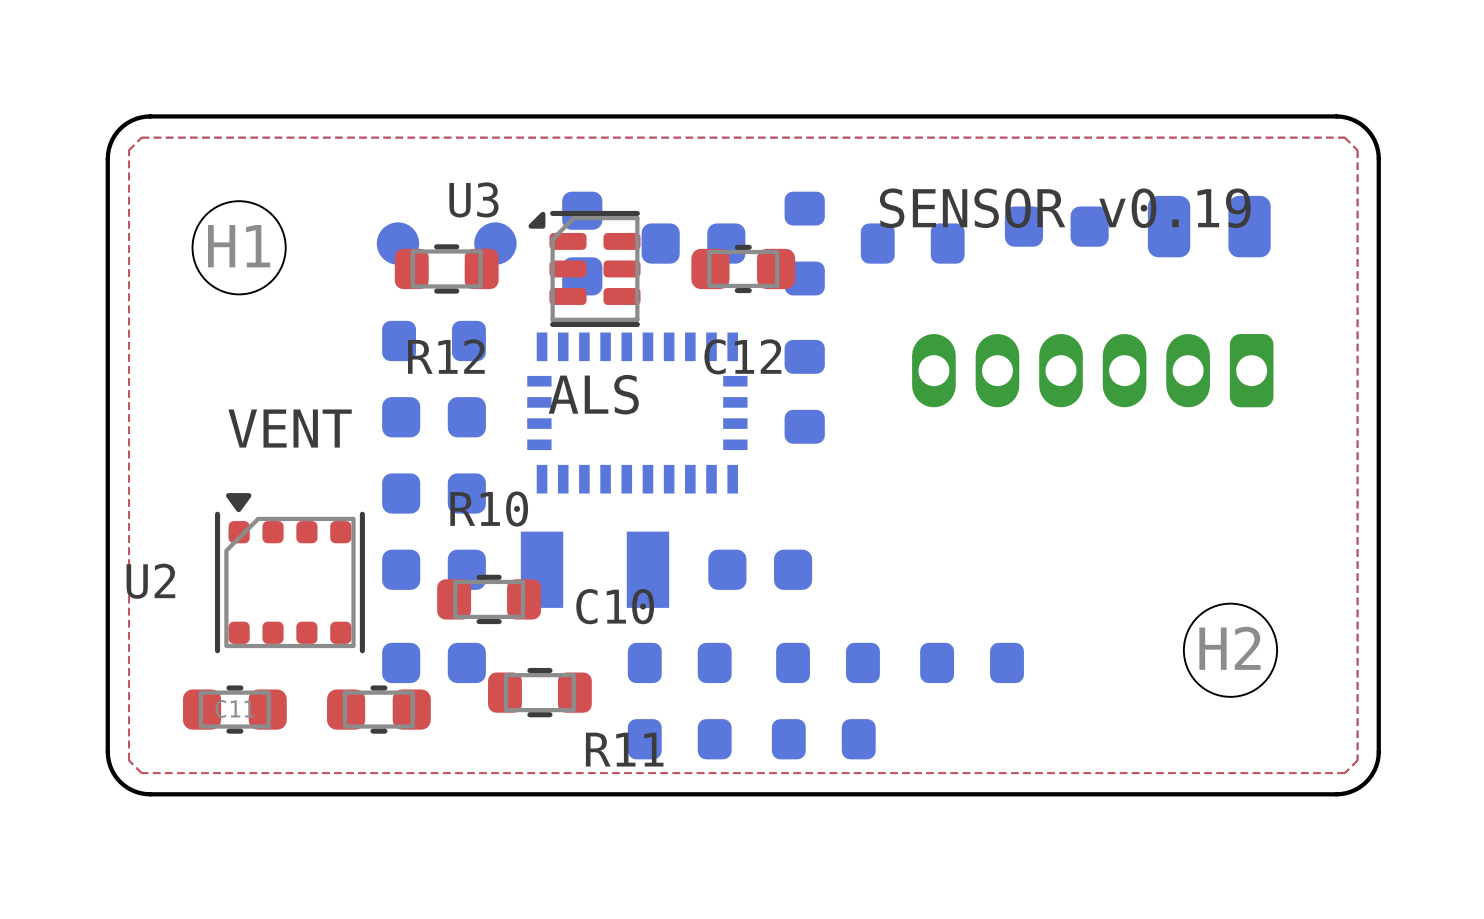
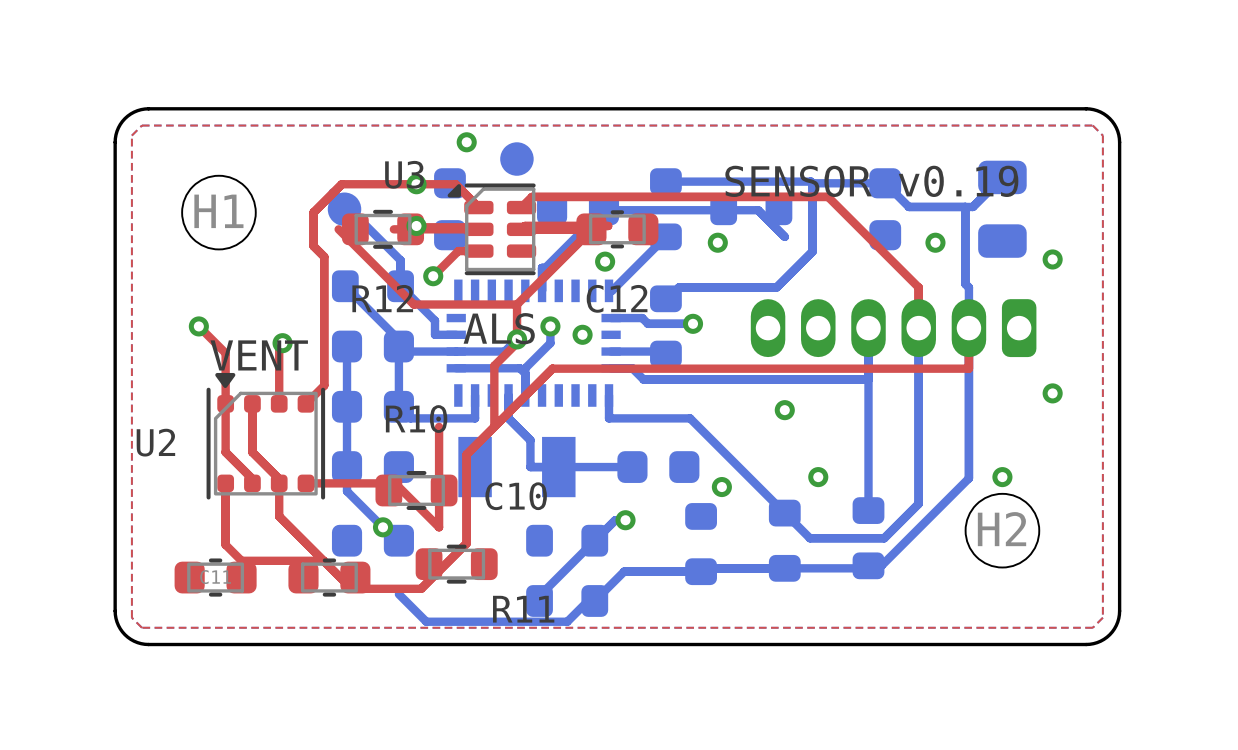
via: none -> (466, 142)
bottom track: none -> (1002, 177) (972, 206) (908, 206) (885, 183) (812, 183)
bottom track: none -> (665, 181) (810, 181) (812, 183)
bottom track: none -> (812, 183) (812, 251) (776, 287) (679, 287) (667, 298)
via: none -> (416, 184)
bottom track: none -> (332, 192) (400, 260) (400, 286) (435, 320) (435, 334) (456, 334)
part rotation: 0° (1056, 226) -> 90° clockwise (885, 209)
part rotation: 0° (1209, 226) -> 90° clockwise (1002, 209)
bottom track: none -> (965, 206) (965, 283) (968, 287) (968, 478) (881, 565) (868, 565) (865, 568) (704, 568) (701, 571) (624, 571) (594, 600)
top track: none -> (478, 207) (455, 184) (341, 184) (313, 212) (313, 246) (324, 256) (324, 385) (306, 403)
top track: none -> (521, 207) (532, 196) (828, 196) (918, 287) (918, 328)
part position: (495, 243) -> (516, 159)
part position: (582, 243) -> (449, 209)
top track: none -> (416, 225) (476, 227) (478, 229) (393, 229)
via: none -> (416, 225)
top track: none -> (608, 225) (524, 225) (521, 229) (585, 229) (587, 234) (517, 304)
top track: none -> (338, 229) (413, 304) (517, 304)
bottom track: none -> (665, 236) (611, 290) (609, 290)
bottom track: none -> (784, 236) (758, 210) (603, 210) (545, 267) (542, 267) (542, 290)
via: none -> (717, 242)
via: none -> (935, 242)
top track: none -> (478, 251) (458, 251) (433, 276)
via: none -> (1052, 259)
via: none -> (605, 261)
via: none -> (433, 276)
bottom track: none -> (345, 286) (398, 339) (398, 406) (410, 418) (475, 418) (475, 395)
top track: none -> (517, 304) (517, 343) (494, 365) (494, 426)
part position: (1092, 370) -> (893, 328)
bottom track: none -> (611, 318) (642, 318) (648, 323) (693, 323)
via: none -> (693, 323)
top track: none -> (198, 326) (225, 353) (225, 452) (252, 479) (252, 483)
via: none -> (198, 326)
bottom track: none -> (550, 326) (550, 343) (525, 368) (525, 395)
via: none -> (550, 326)
bottom track: none -> (868, 328) (868, 510)
bottom track: none -> (918, 328) (918, 503) (884, 538) (809, 538) (690, 418) (609, 418) (609, 395)
top track: none -> (968, 328) (968, 368) (552, 368) (466, 454) (466, 543) (421, 588) (351, 588) (279, 516) (279, 479) (252, 452) (252, 403)
via: none -> (582, 334)
bottom track: none -> (517, 339) (504, 351) (398, 351)
via: none -> (517, 339)
top track: none -> (282, 343) (279, 346) (279, 403)
via: none -> (282, 343)
bottom track: none -> (347, 346) (347, 491) (383, 527)
bottom track: none -> (611, 351) (665, 351) (667, 354)
bottom track: none -> (456, 368) (519, 368) (525, 373)
bottom track: none -> (611, 368) (632, 368) (643, 379) (868, 379)
via: none -> (1052, 393)
bottom track: none -> (508, 395) (508, 418) (530, 440) (530, 467) (632, 467)
via: none -> (784, 410)
top track: none -> (439, 426) (439, 527) (395, 483) (306, 483)
part position: (594, 569) -> (516, 467)
part position: (760, 569) -> (658, 467)
U2 position: (289, 573) -> (265, 436)
via: none -> (818, 477)
via: none -> (1002, 477)
top track: none -> (225, 483) (225, 544) (241, 560) (323, 560)
via: none -> (721, 487)
bottom track: none -> (625, 520) (615, 520) (539, 595) (539, 600)
via: none -> (625, 520)
via: none -> (383, 527)
part rotation: 0° (828, 662) -> 90° clockwise (701, 544)
part rotation: 0° (972, 662) -> 90° clockwise (784, 540)
bottom track: none -> (398, 594) (426, 621) (567, 621) (594, 594)
part rotation: 0° (823, 739) -> 90° clockwise (868, 538)
part position: (823, 739) -> (868, 538)

